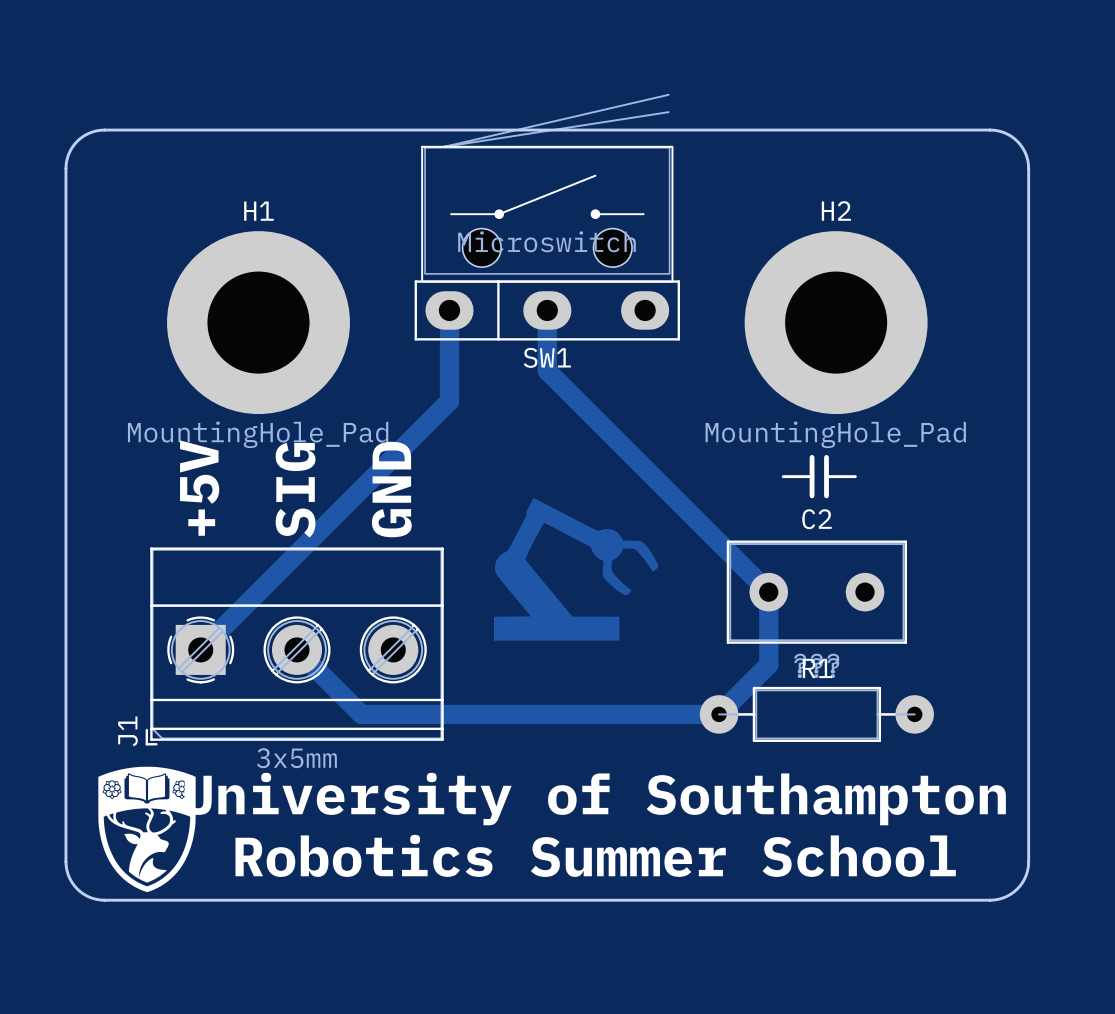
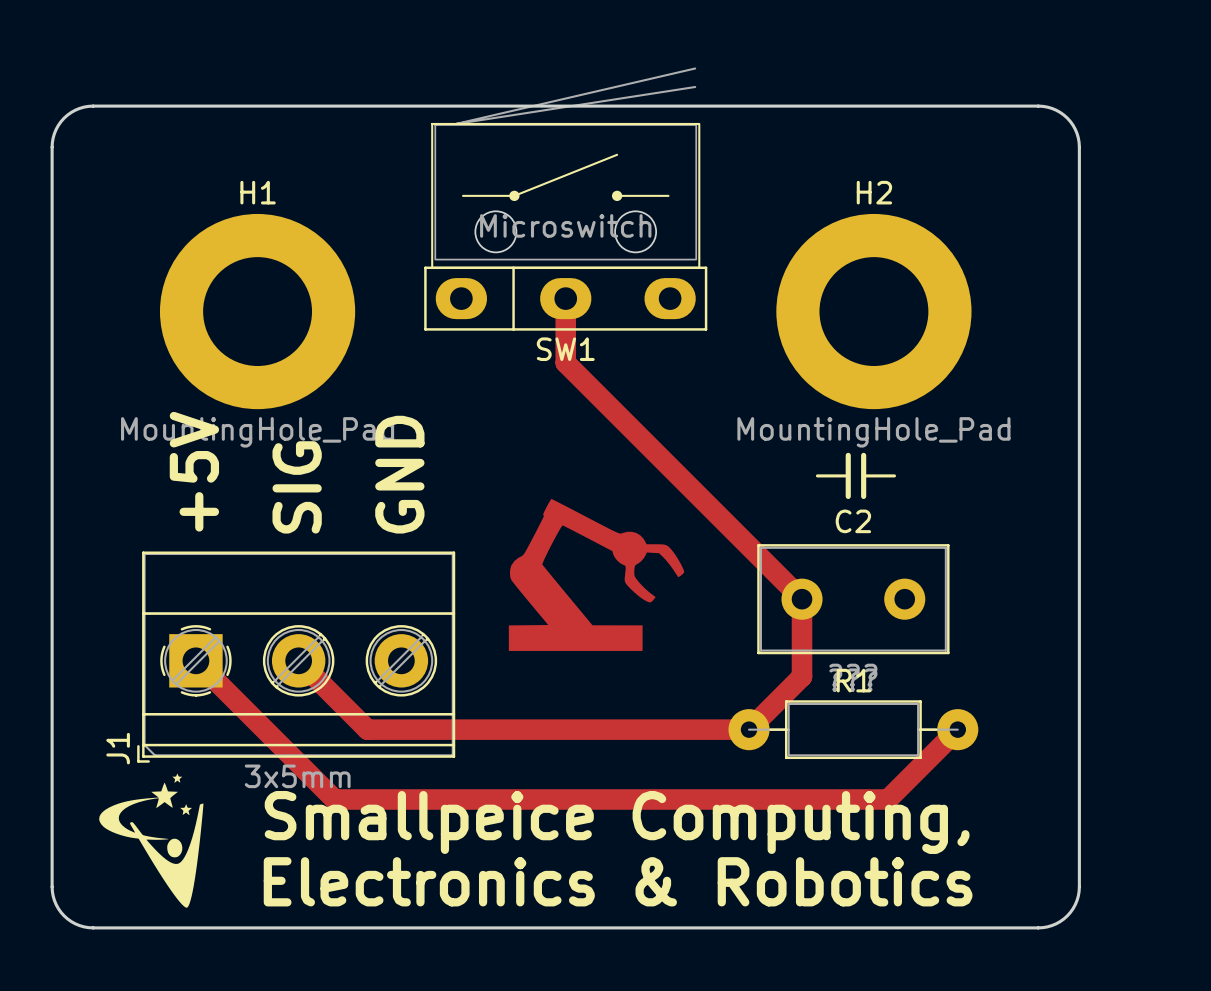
track: (449, 310) (449, 401) (200, 649) -> (957, 729) (887, 799) (334, 799) (195, 660)
drawing shape: [98, 766, 196, 893] -> [99, 773, 204, 908]
text: University of Southampton (595, 799) -> Smallpeice Computing, (617, 822)
text: Robotics Summer School (595, 855) -> Electronics & Robotics (618, 881)

